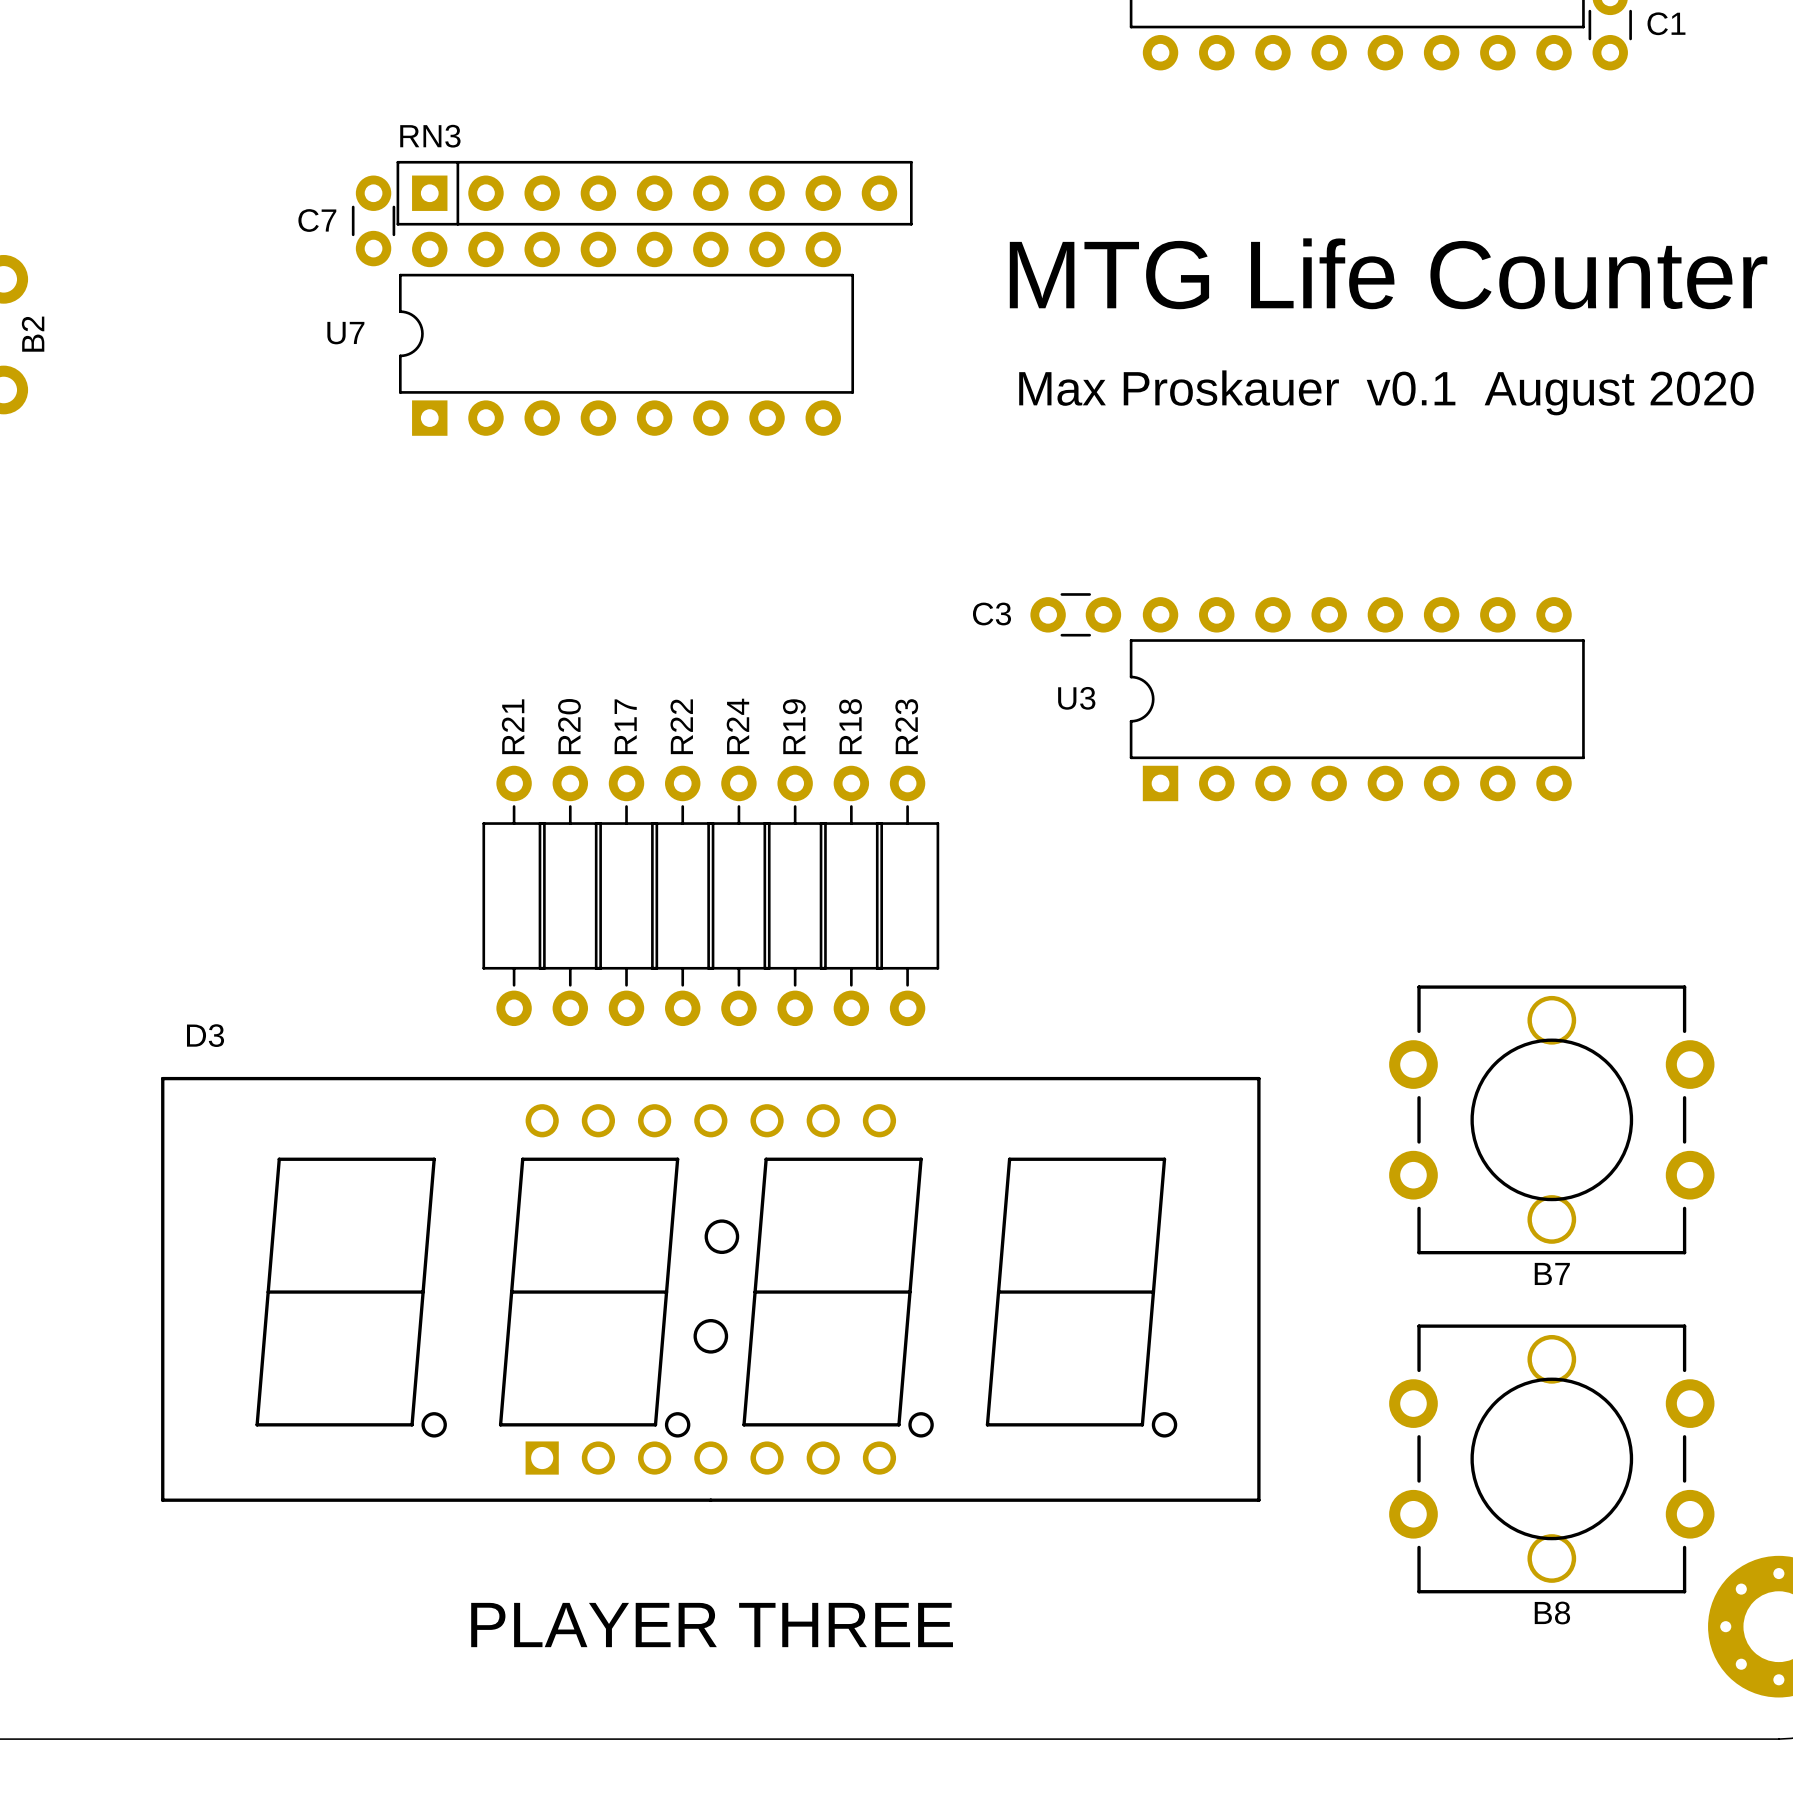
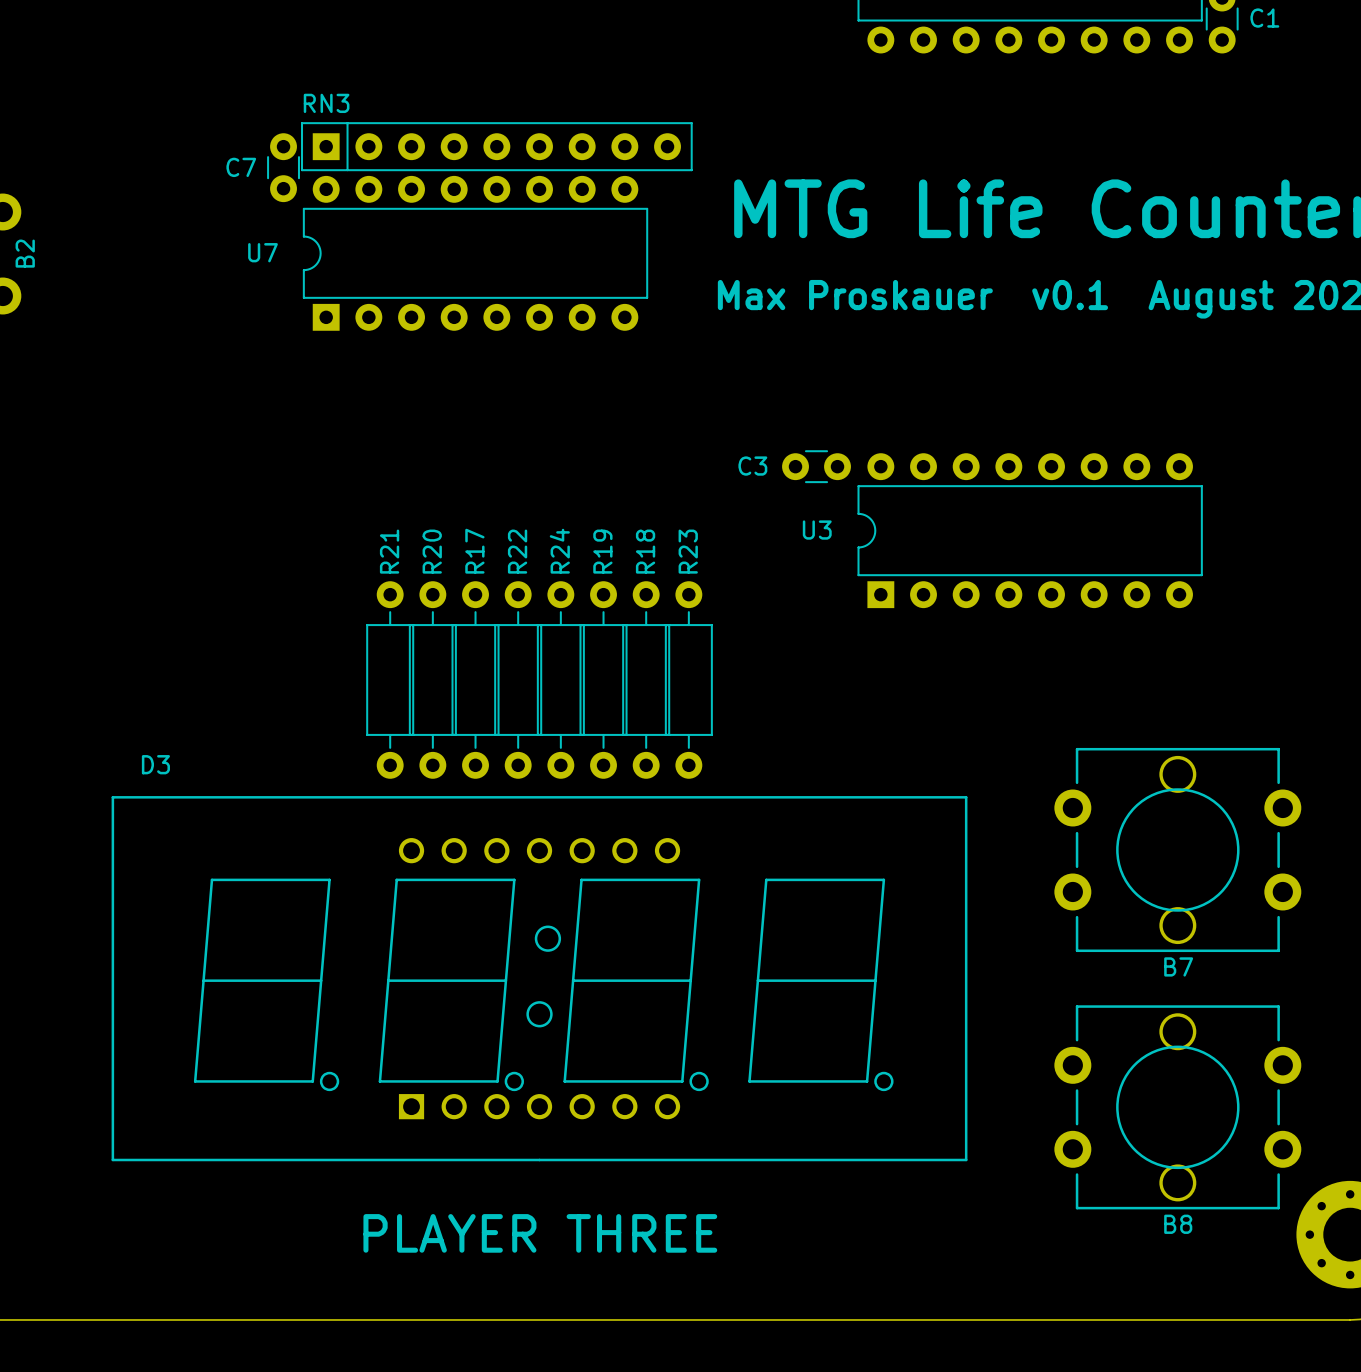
D3 footprint: [161, 1076, 1261, 1502] -> [111, 796, 968, 1162]

